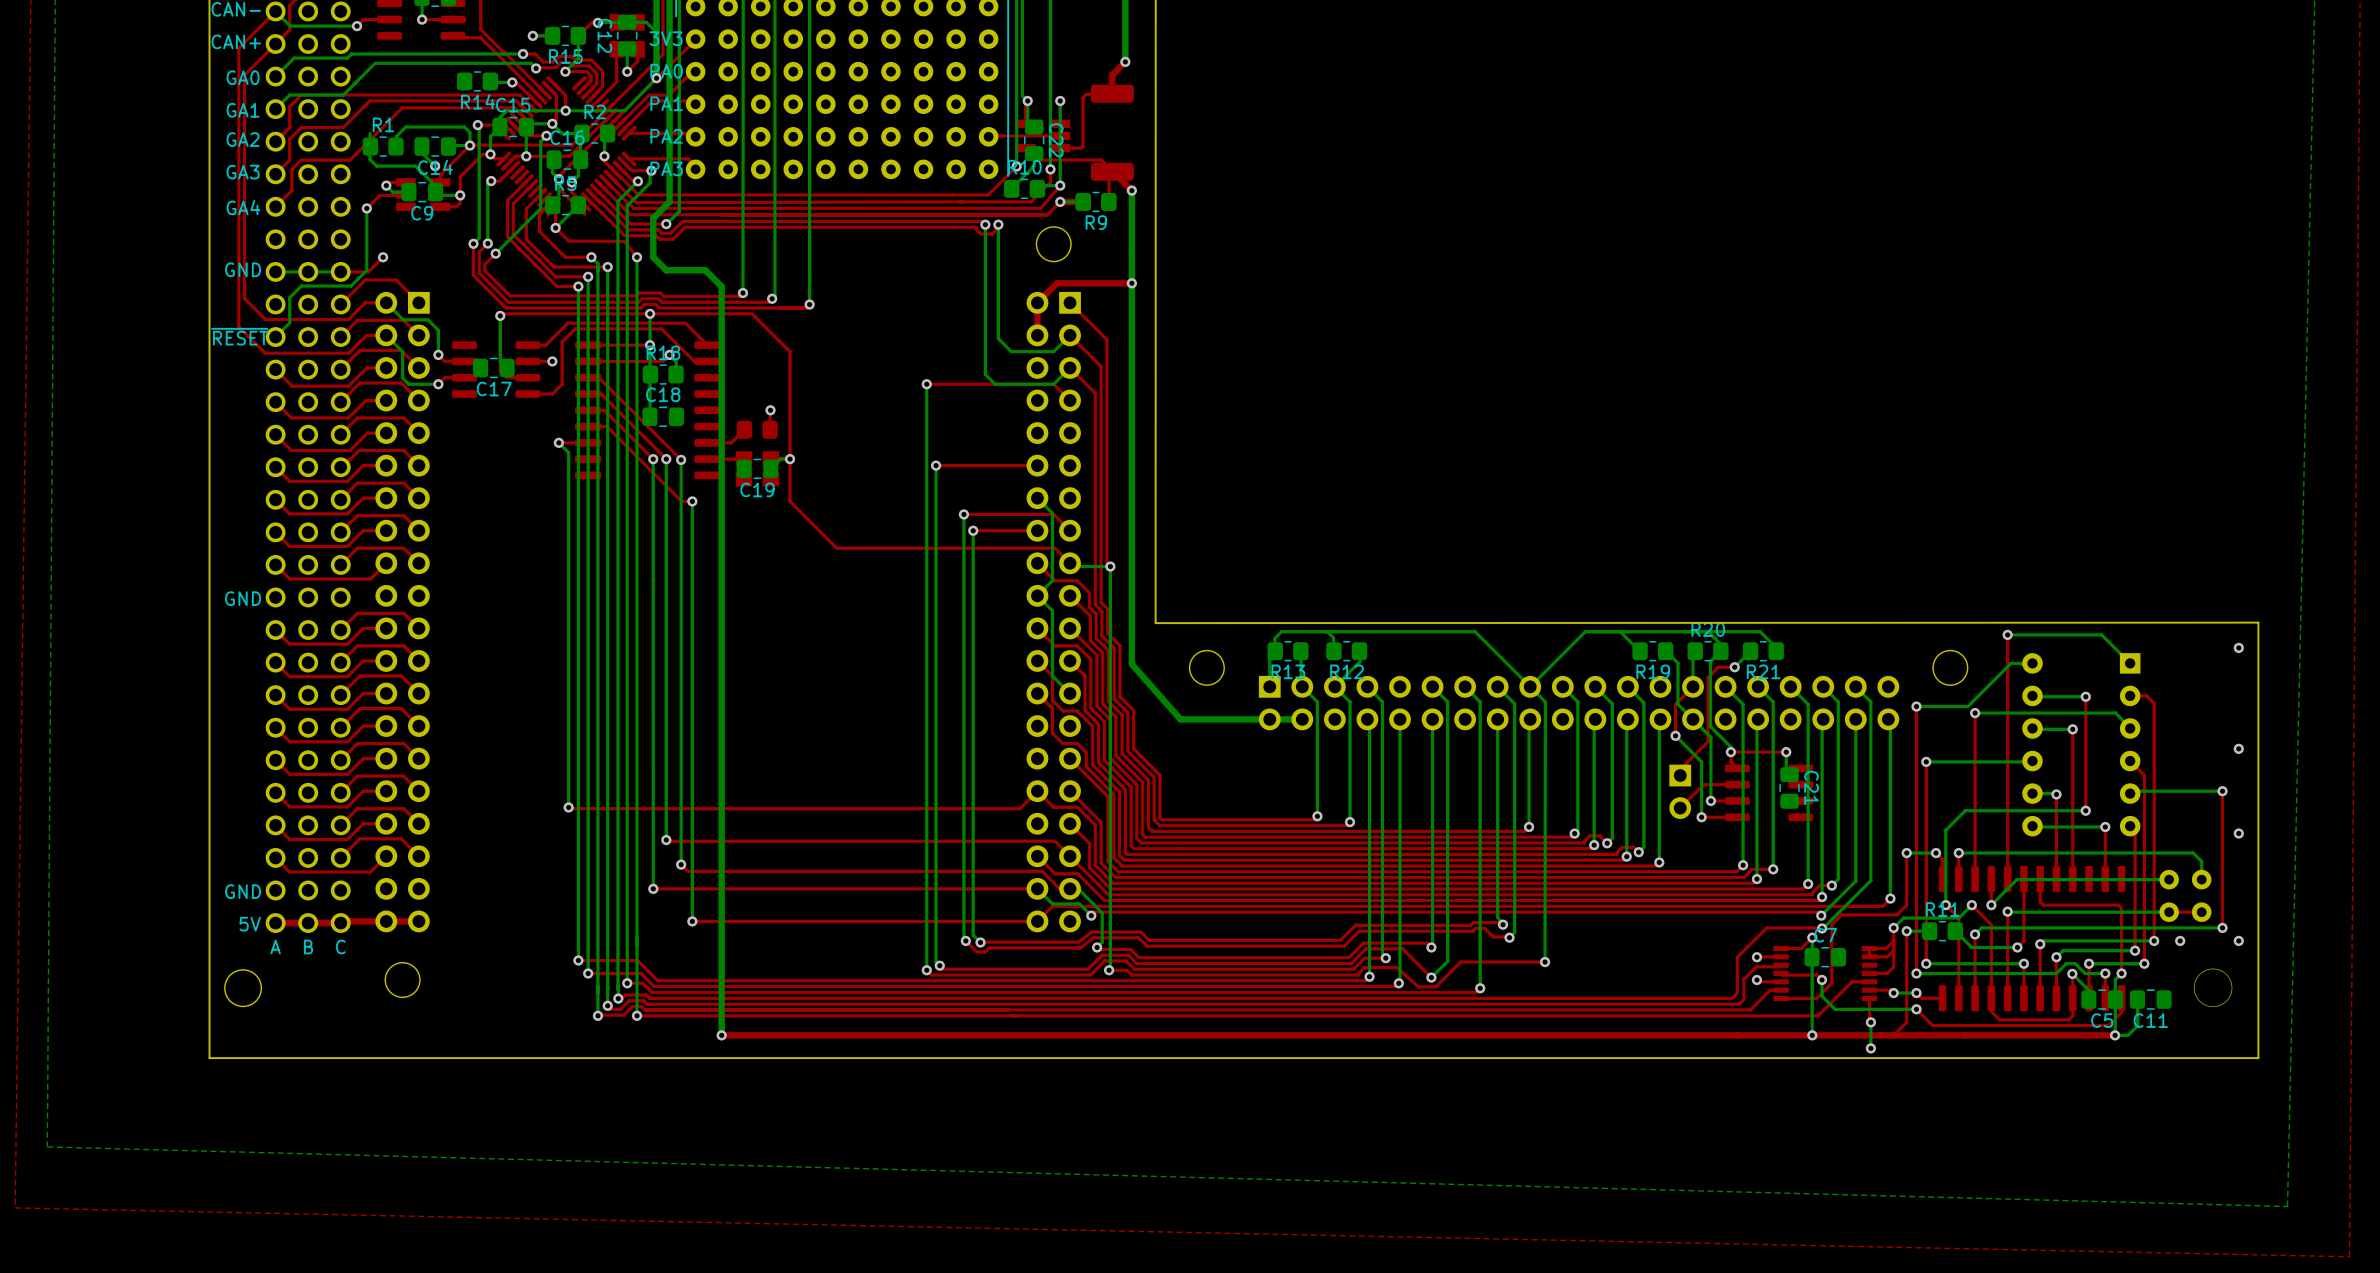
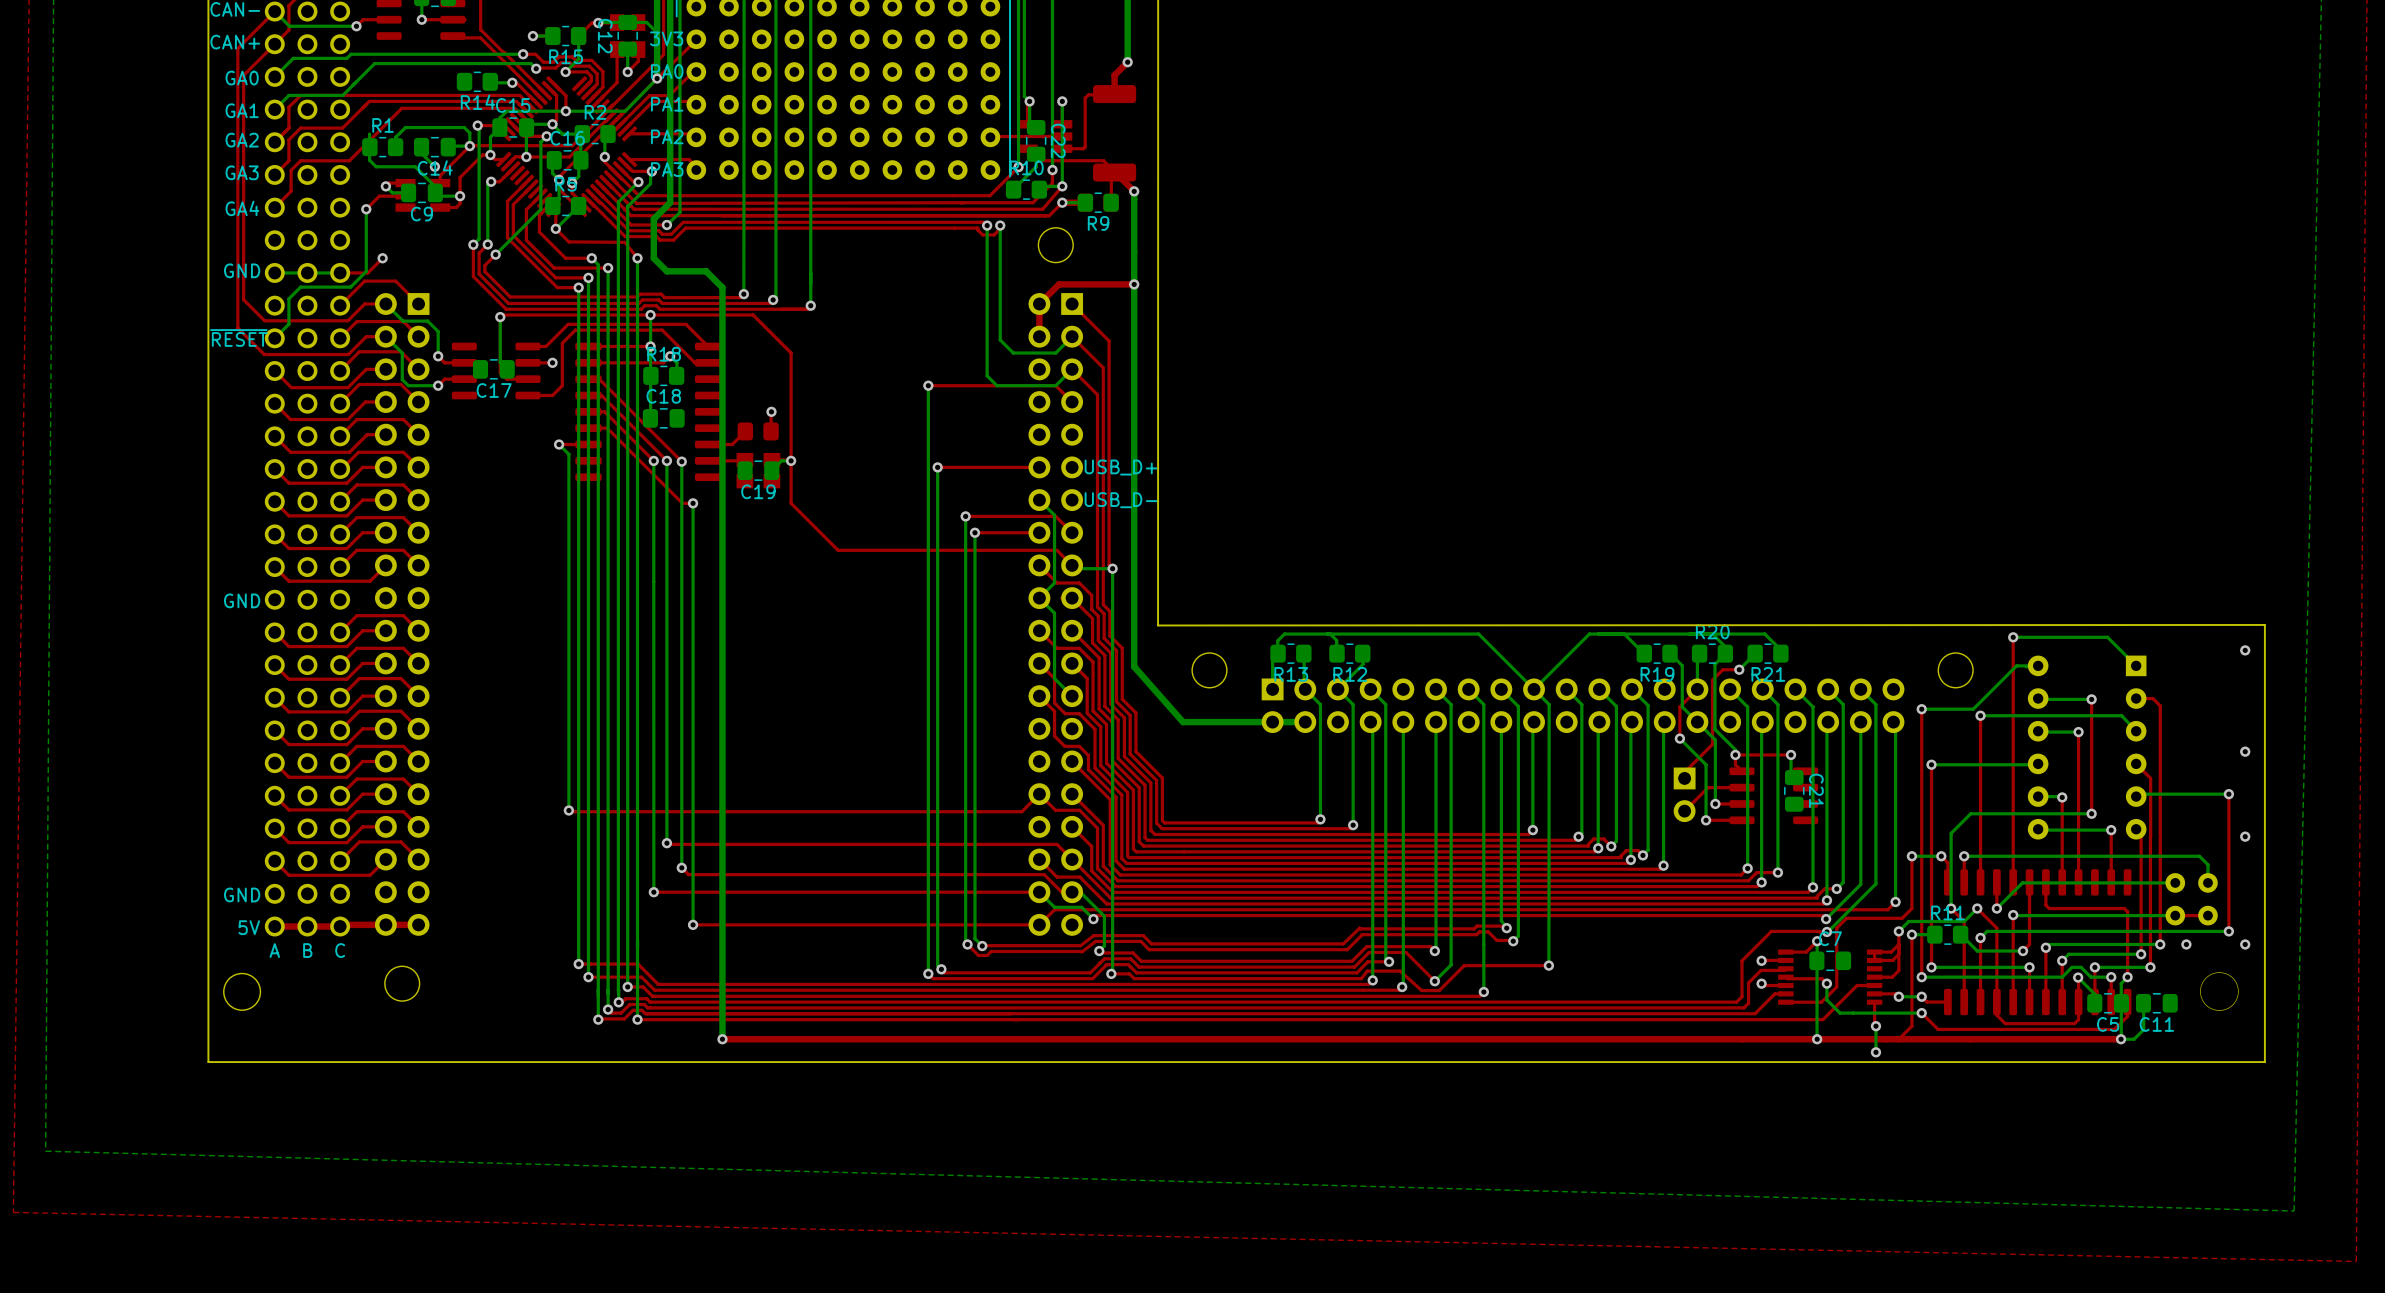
text: none -> USB_D+ (1121, 467)
text: none -> USB_D- (1121, 500)

